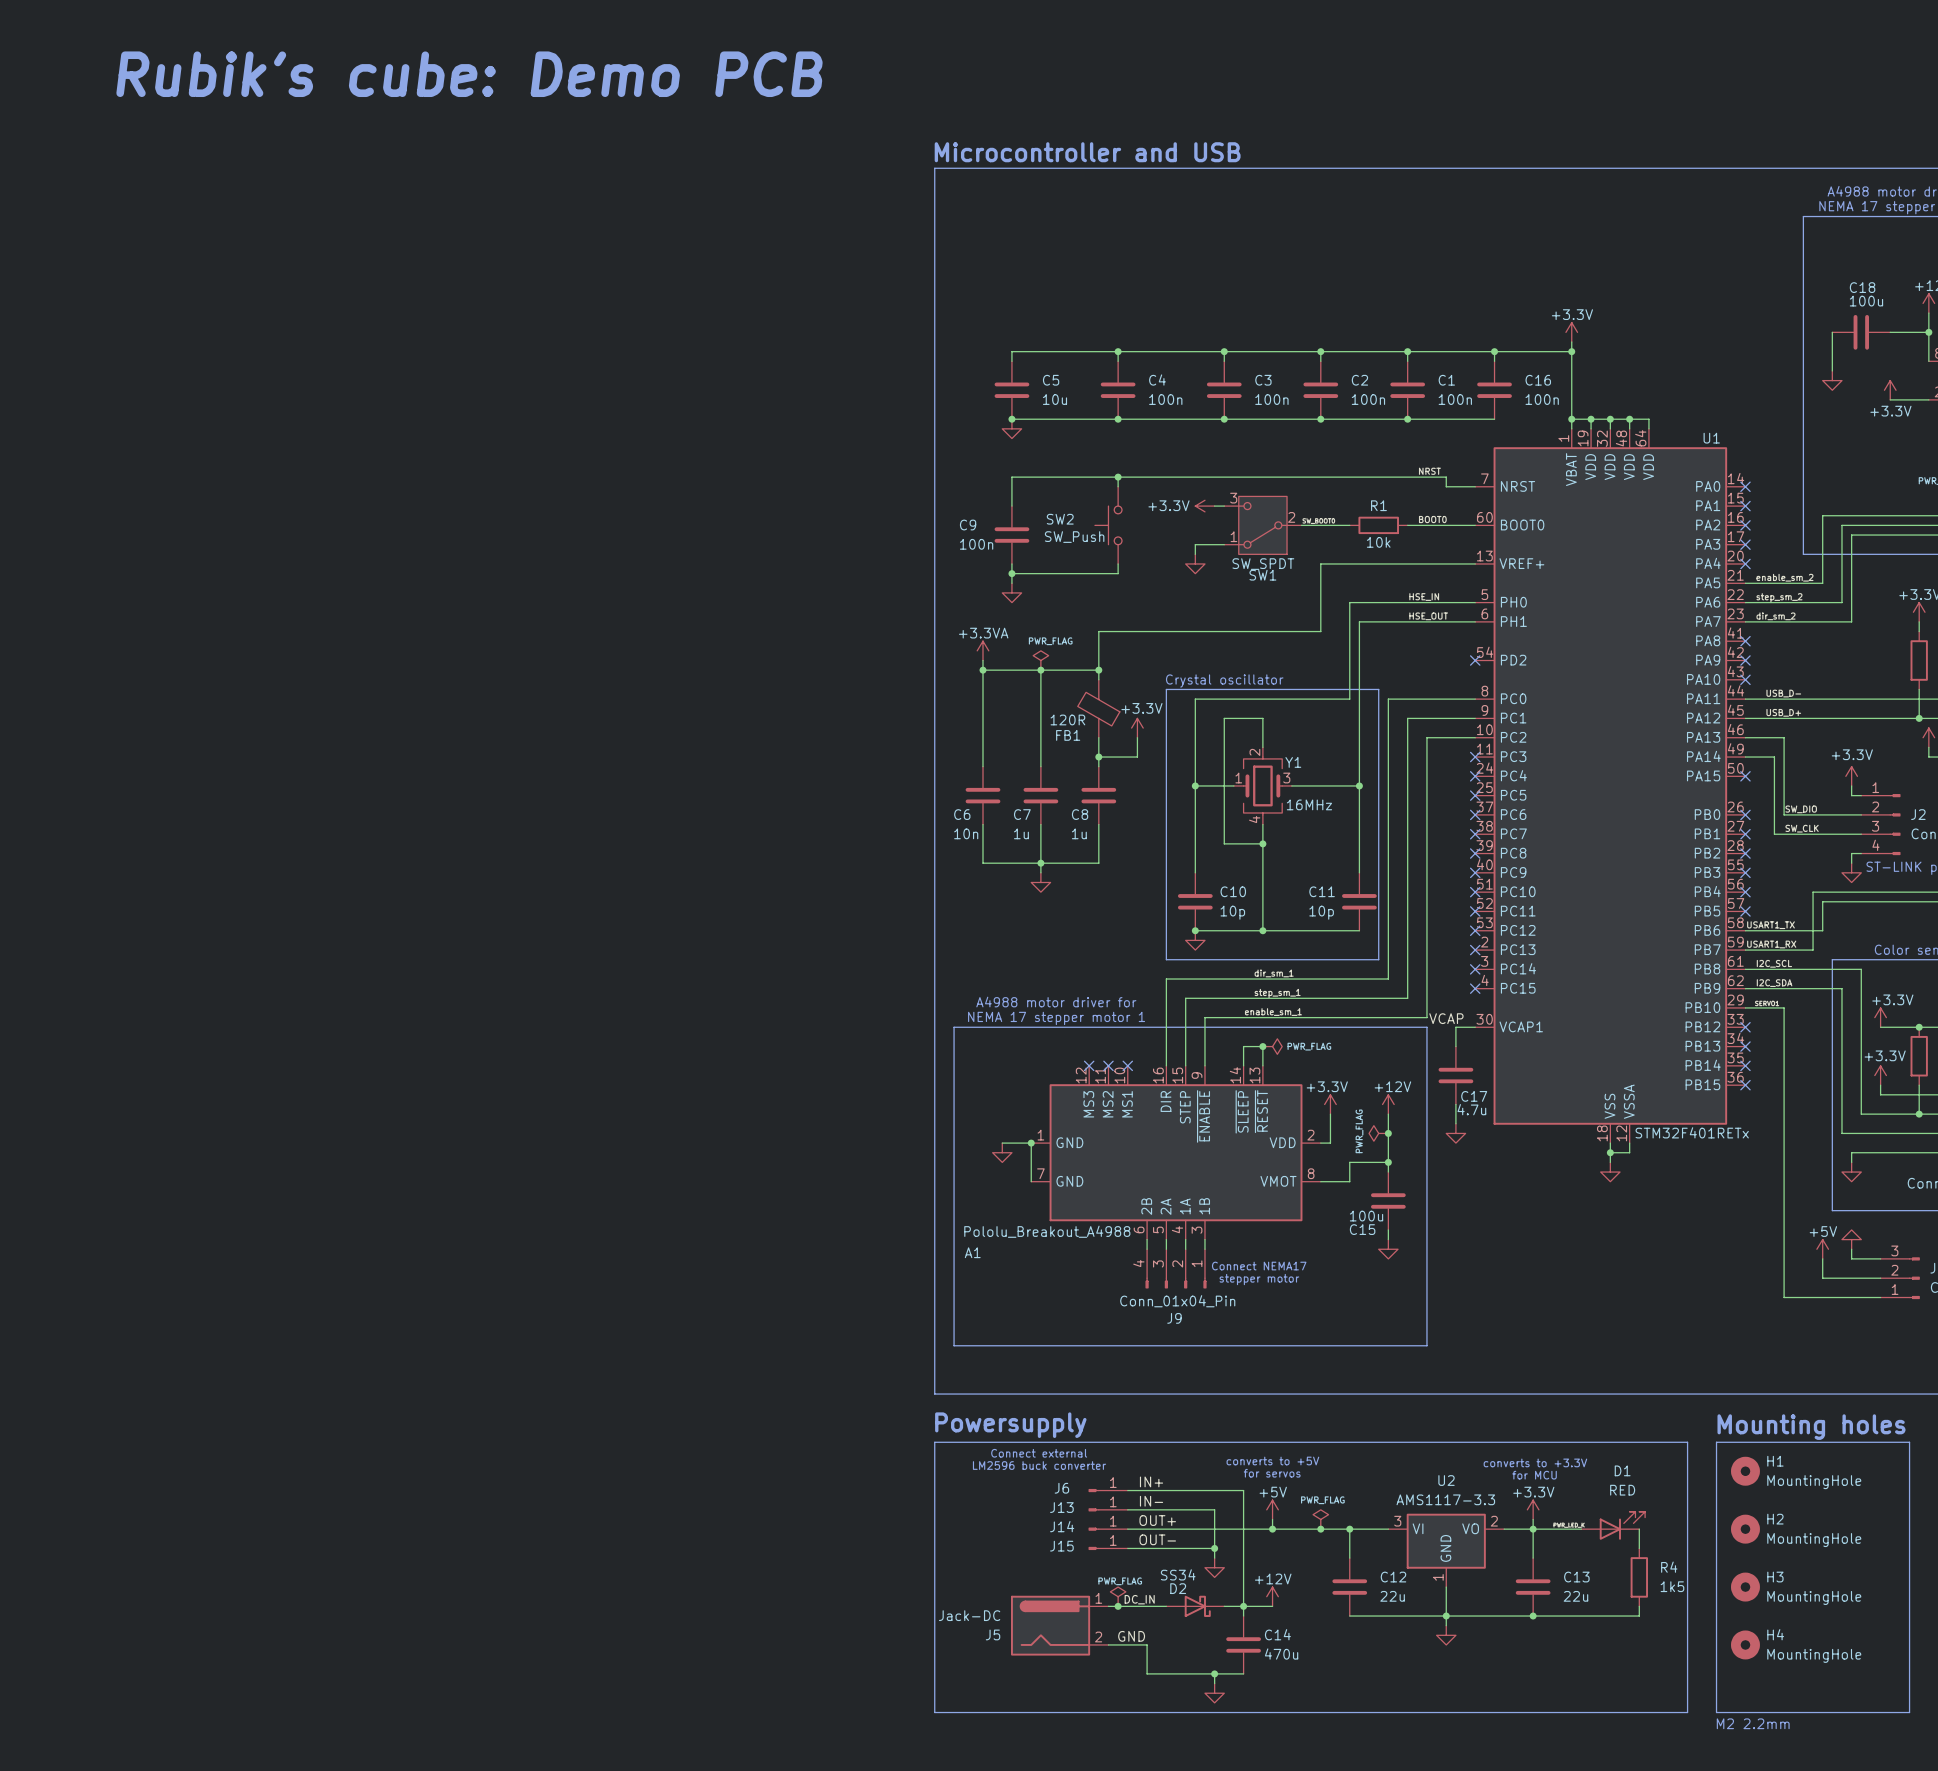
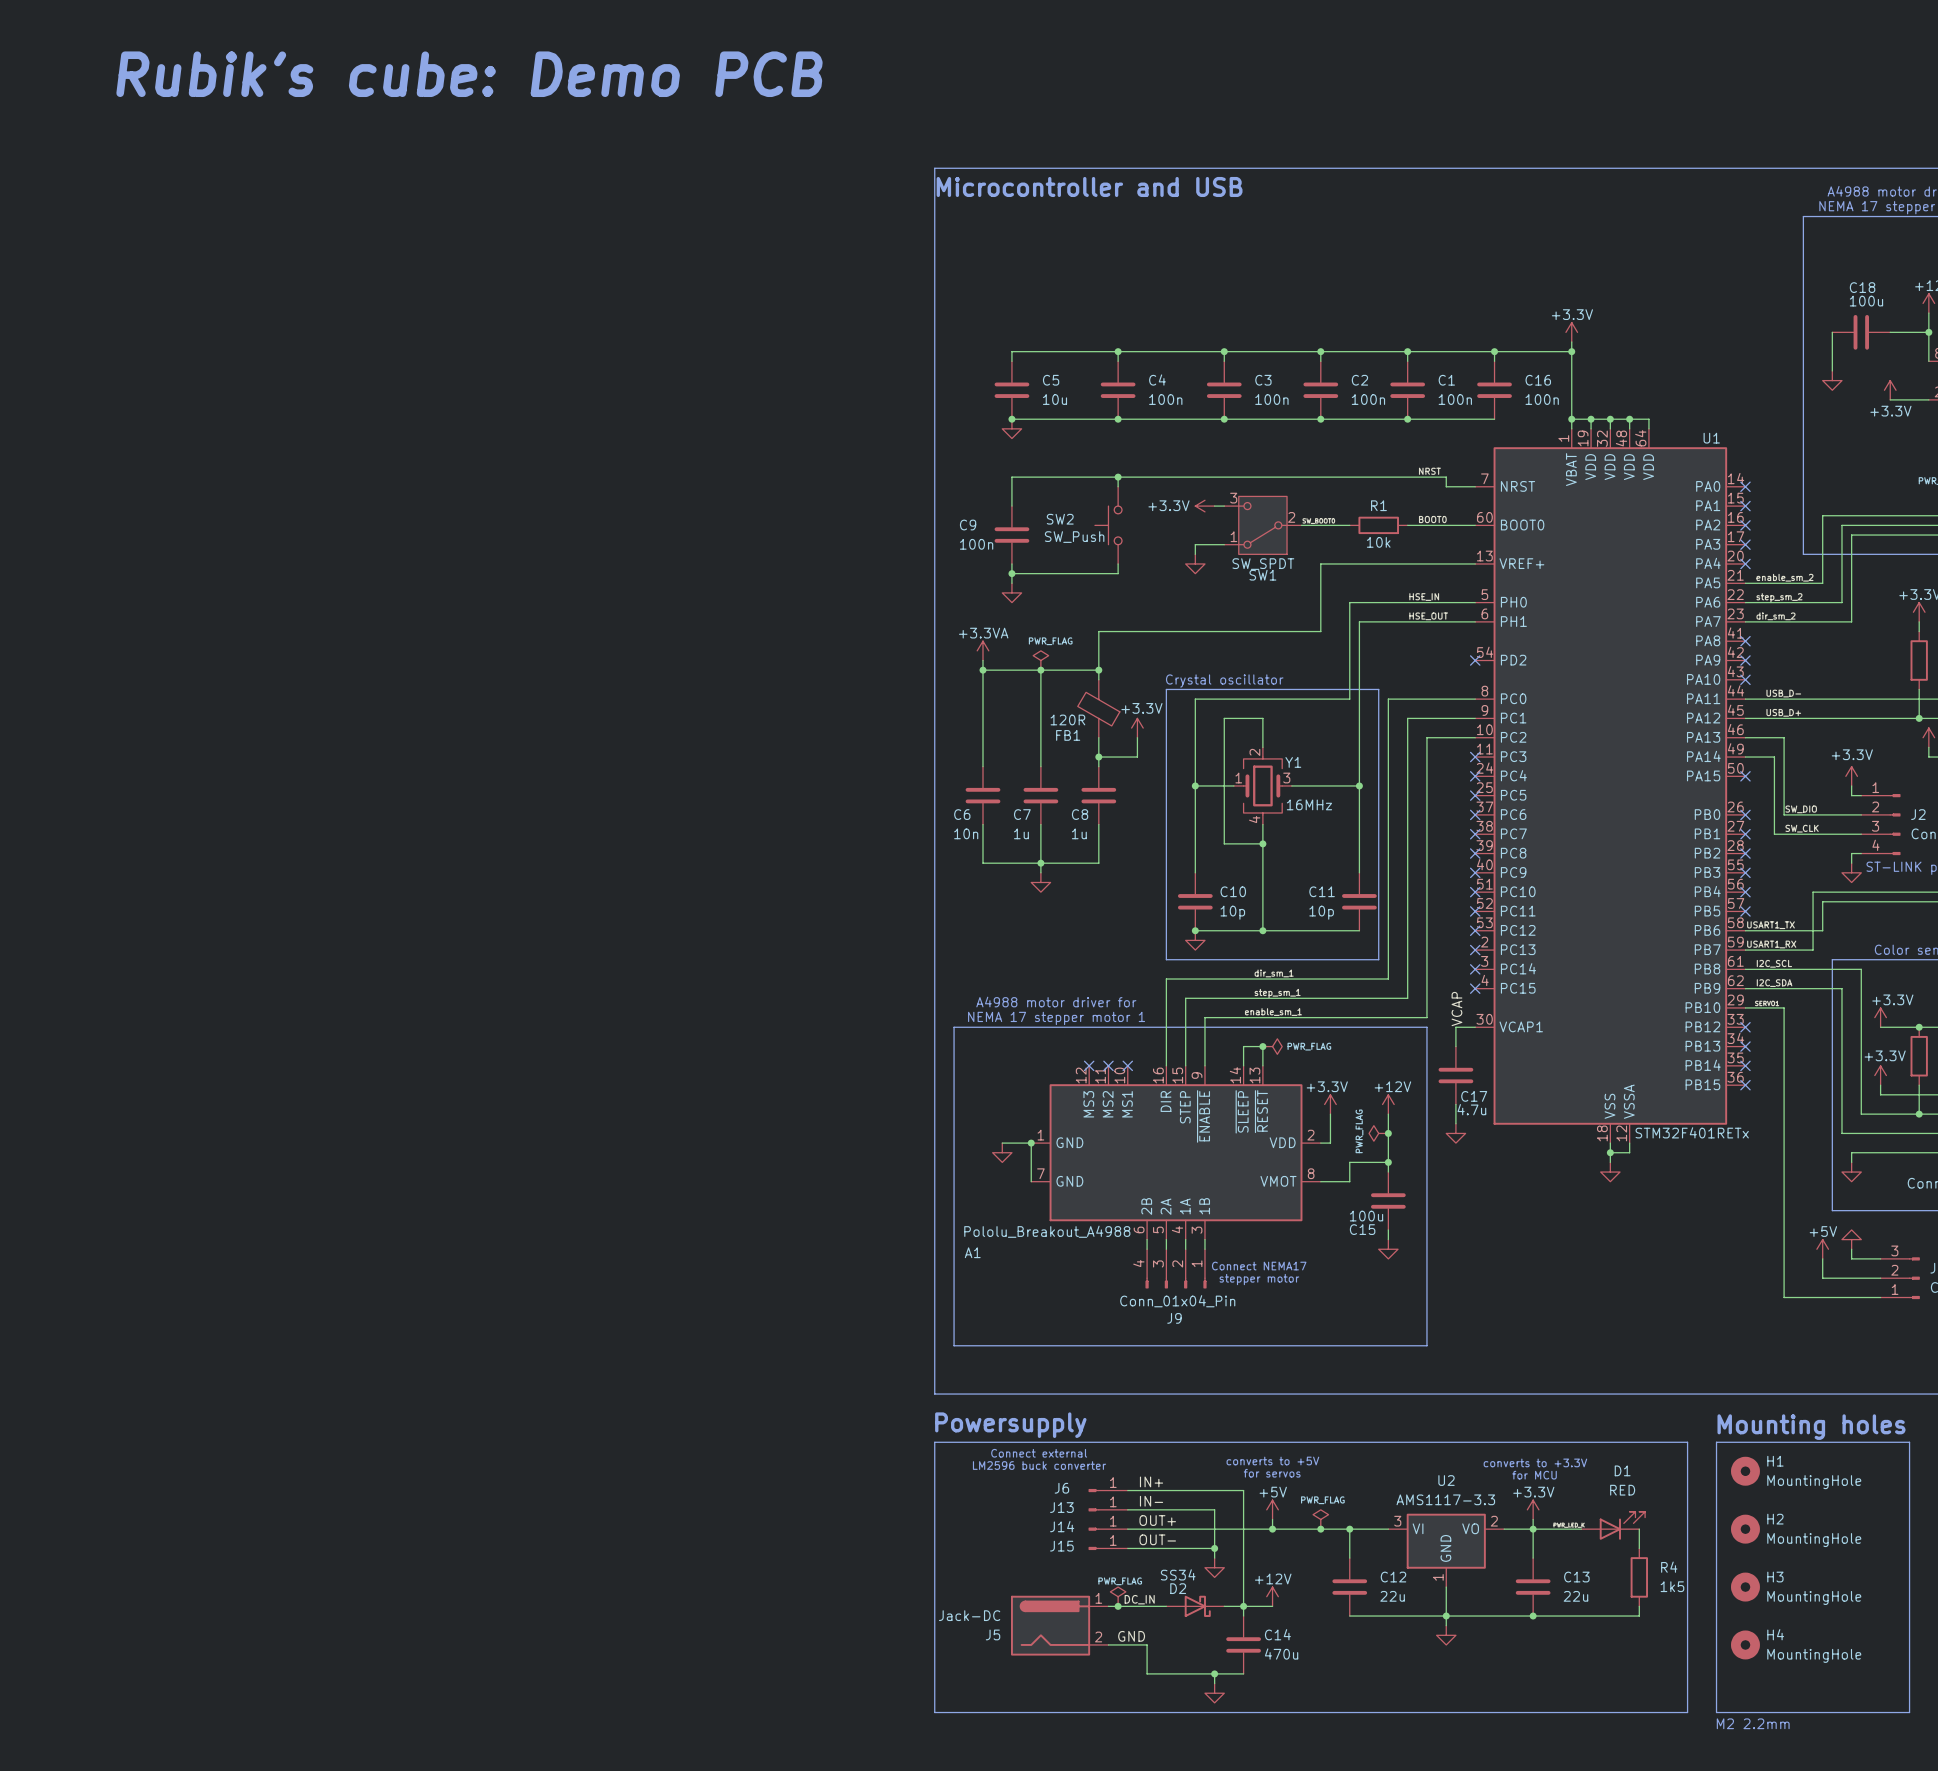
text position: Microcontroller and USB (1087, 152) -> Microcontroller and USB (1089, 186)
label rotation: 0° (1446, 1018) -> 90° counterclockwise (1456, 1009)

